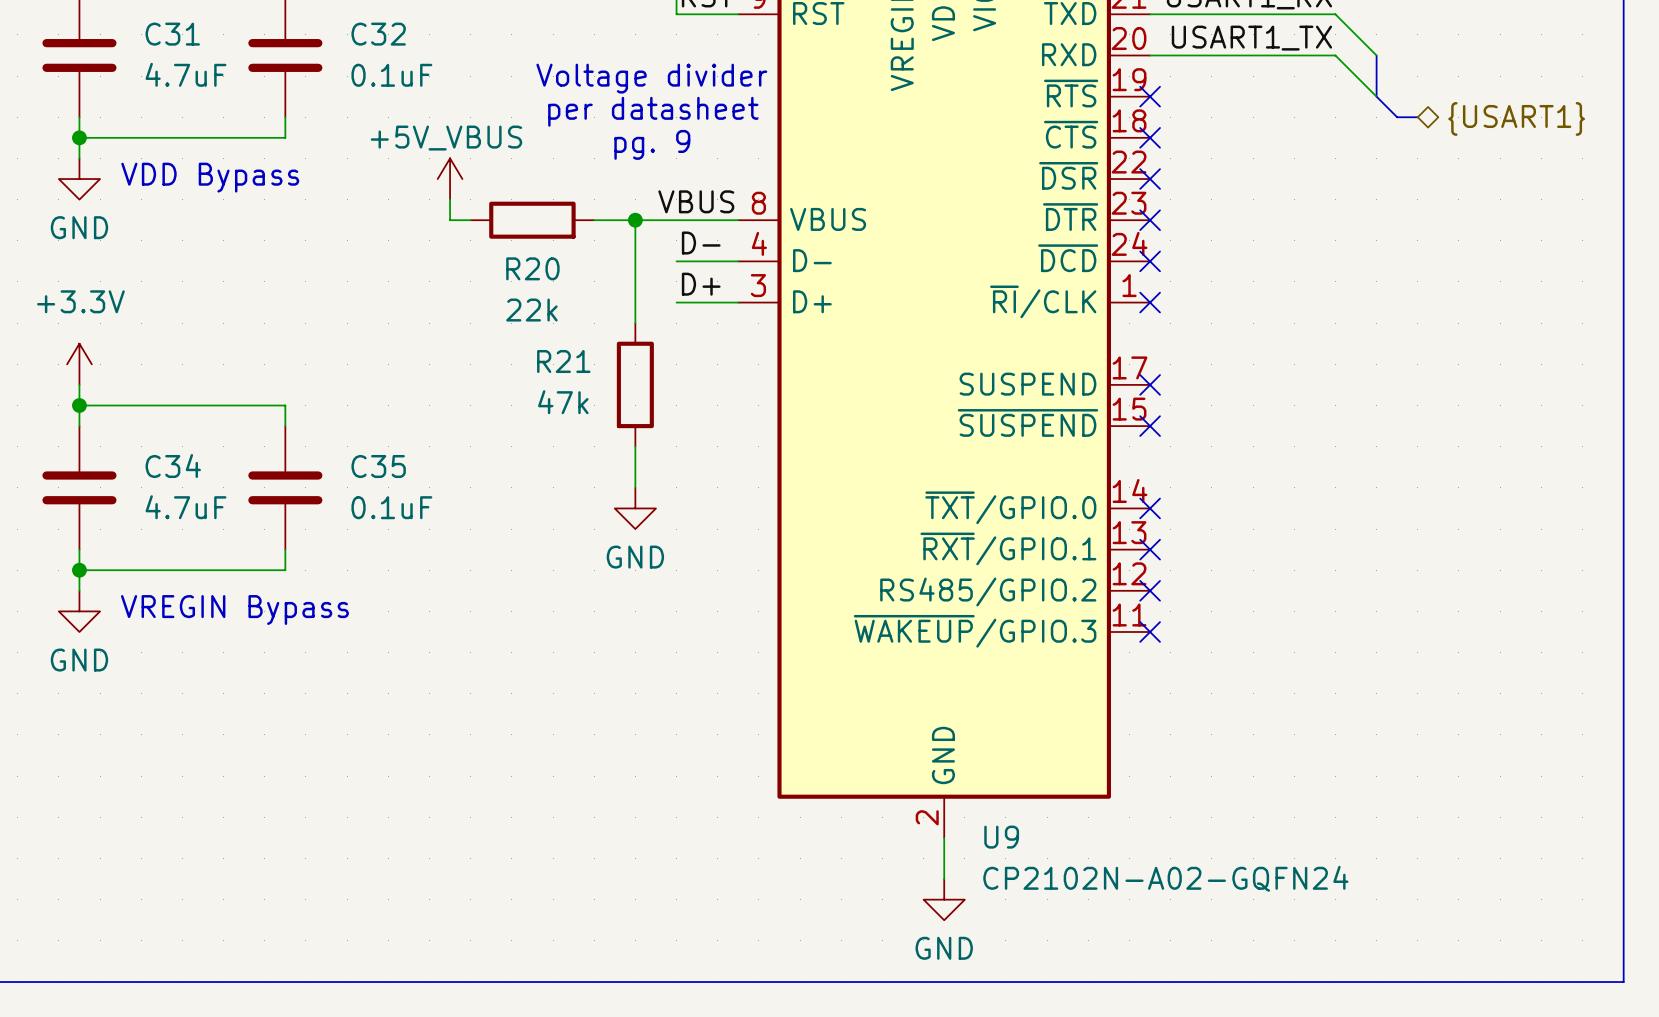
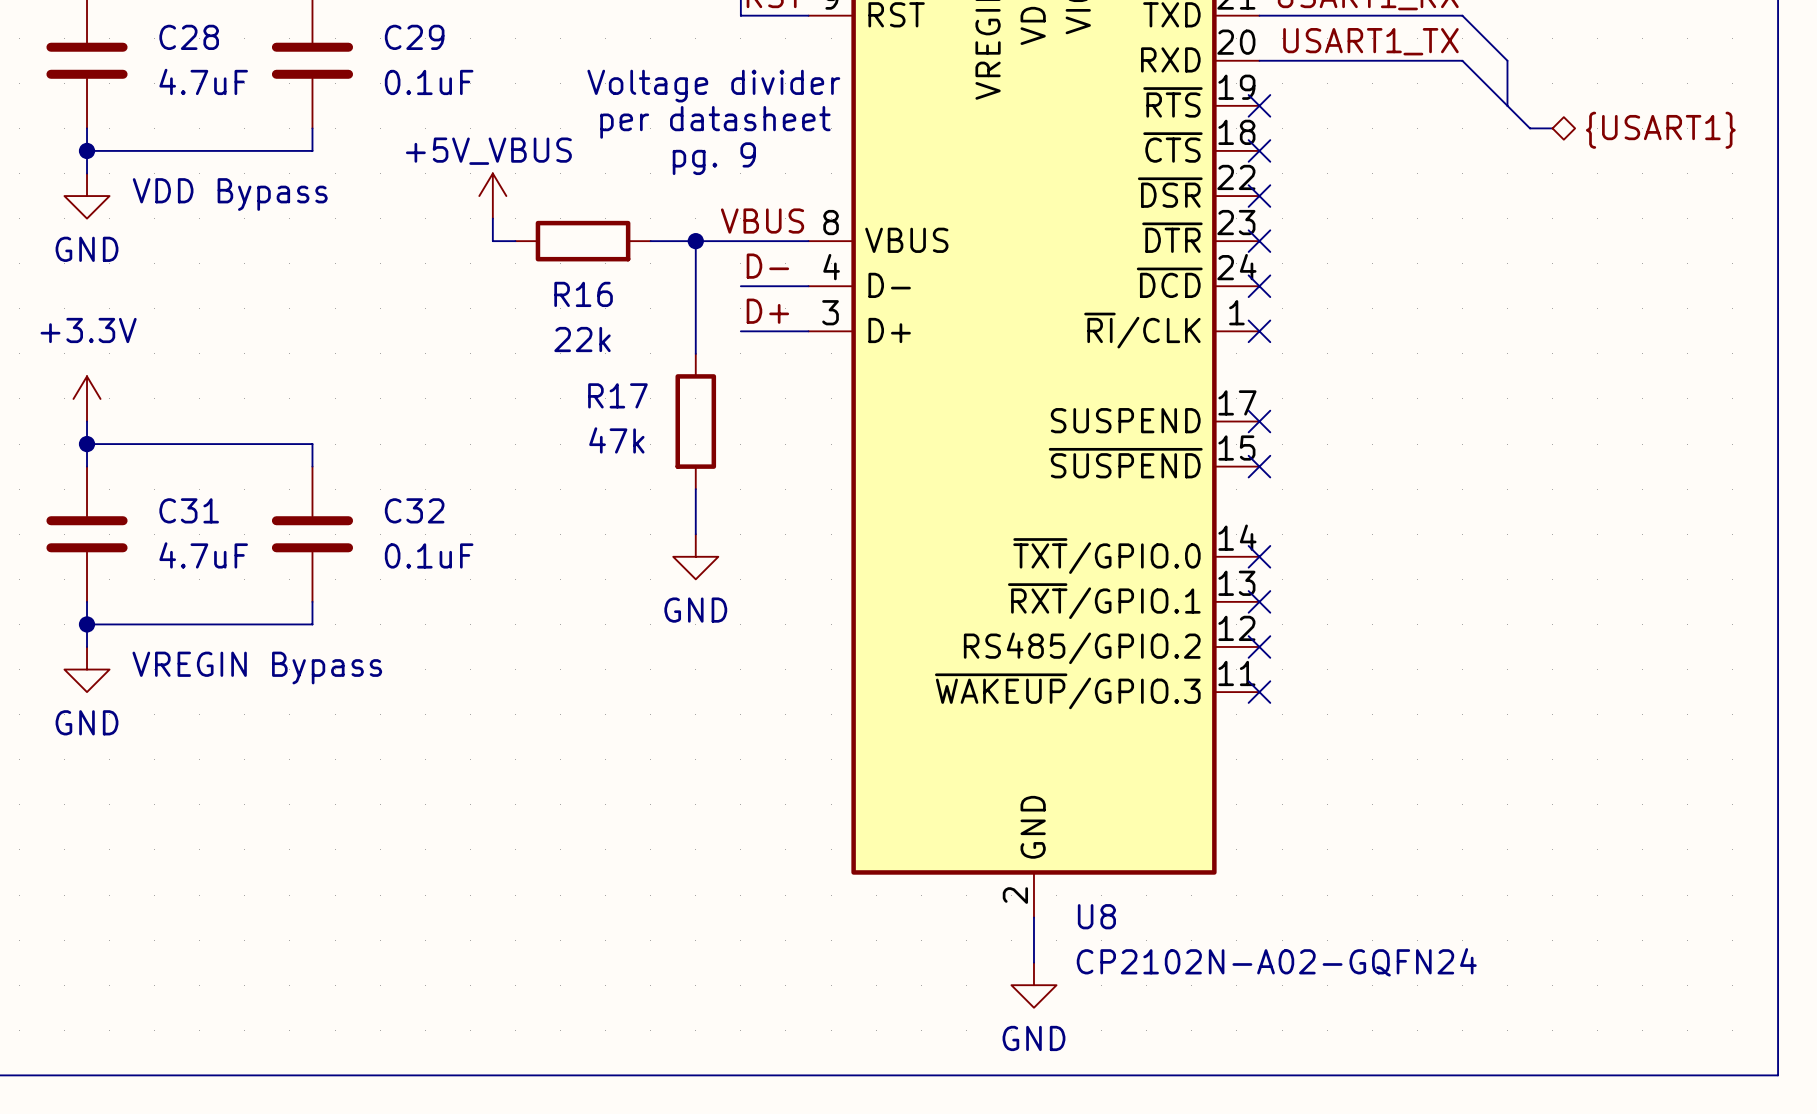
C31 name: C31 (172, 34) -> C28 (189, 37)
C32 name: C32 (378, 34) -> C29 (414, 37)
R20 name: R20 (532, 268) -> R16 (583, 294)
R21 name: R21 (563, 361) -> R17 (617, 395)
C34 name: C34 (173, 466) -> C31 (189, 510)
C35 name: C35 (378, 466) -> C32 (414, 510)
U9 name: U9 (1001, 837) -> U8 (1096, 916)

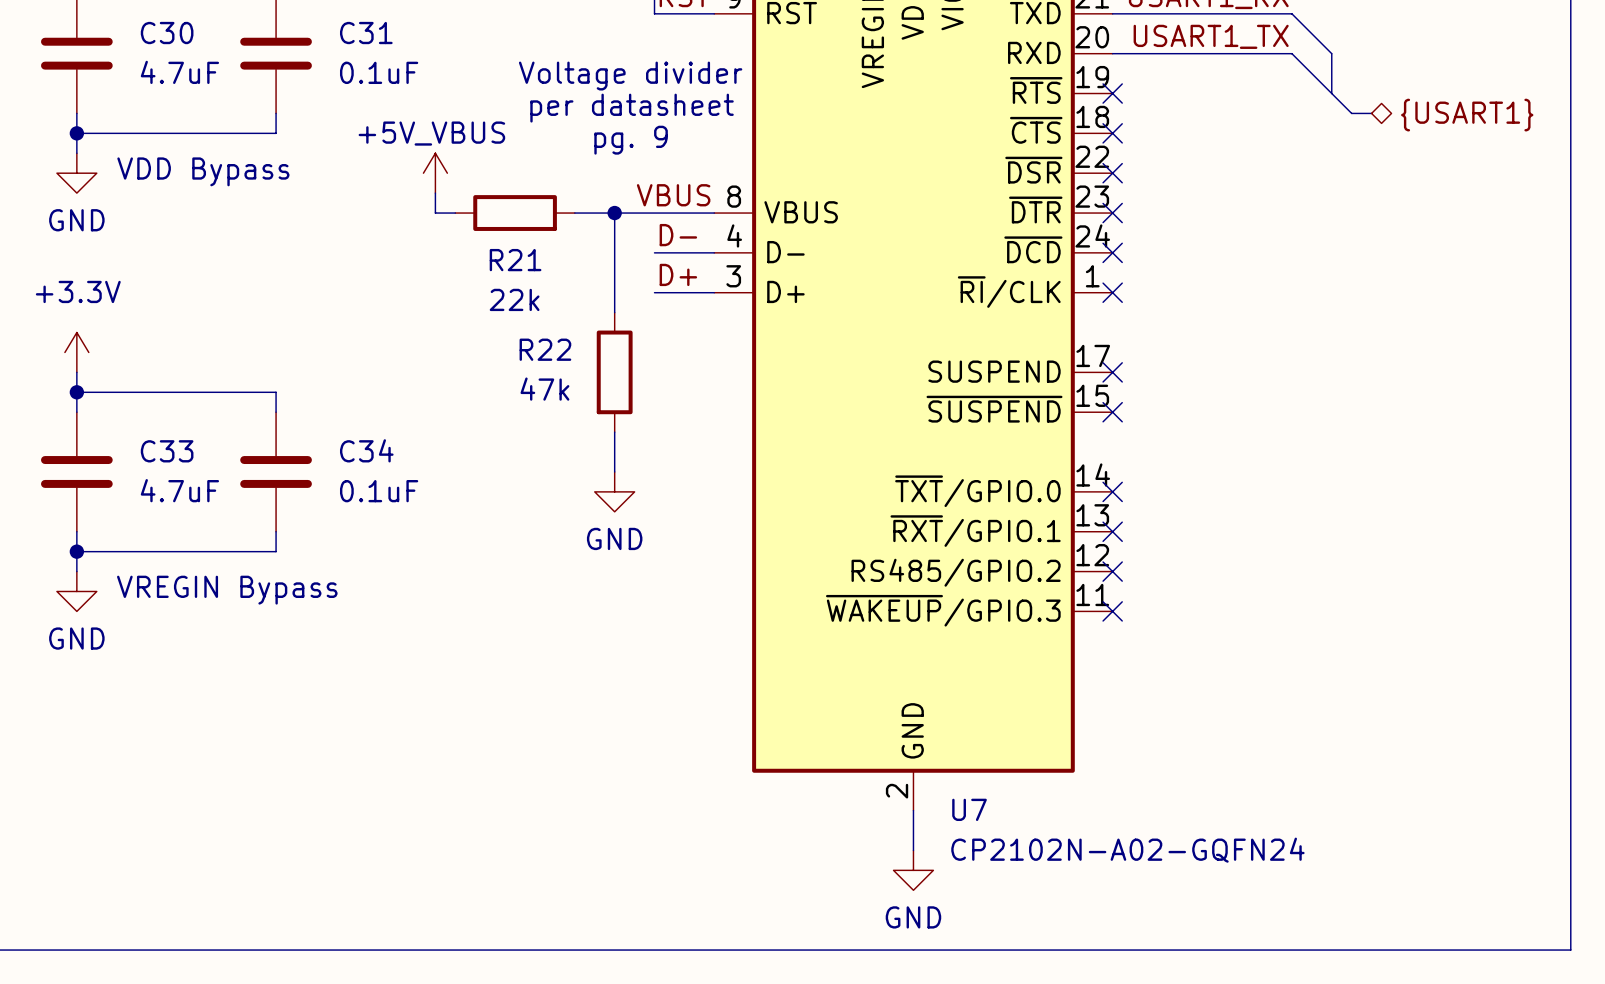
C28 name: C28 (189, 37) -> C30 (167, 33)
C29 name: C29 (414, 37) -> C31 (366, 33)
R16 name: R16 (583, 294) -> R21 (515, 260)
R17 name: R17 (617, 395) -> R22 (545, 349)
C31 name: C31 (189, 510) -> C33 (167, 451)
C32 name: C32 (414, 510) -> C34 (366, 450)
U8 name: U8 (1096, 916) -> U7 (969, 809)

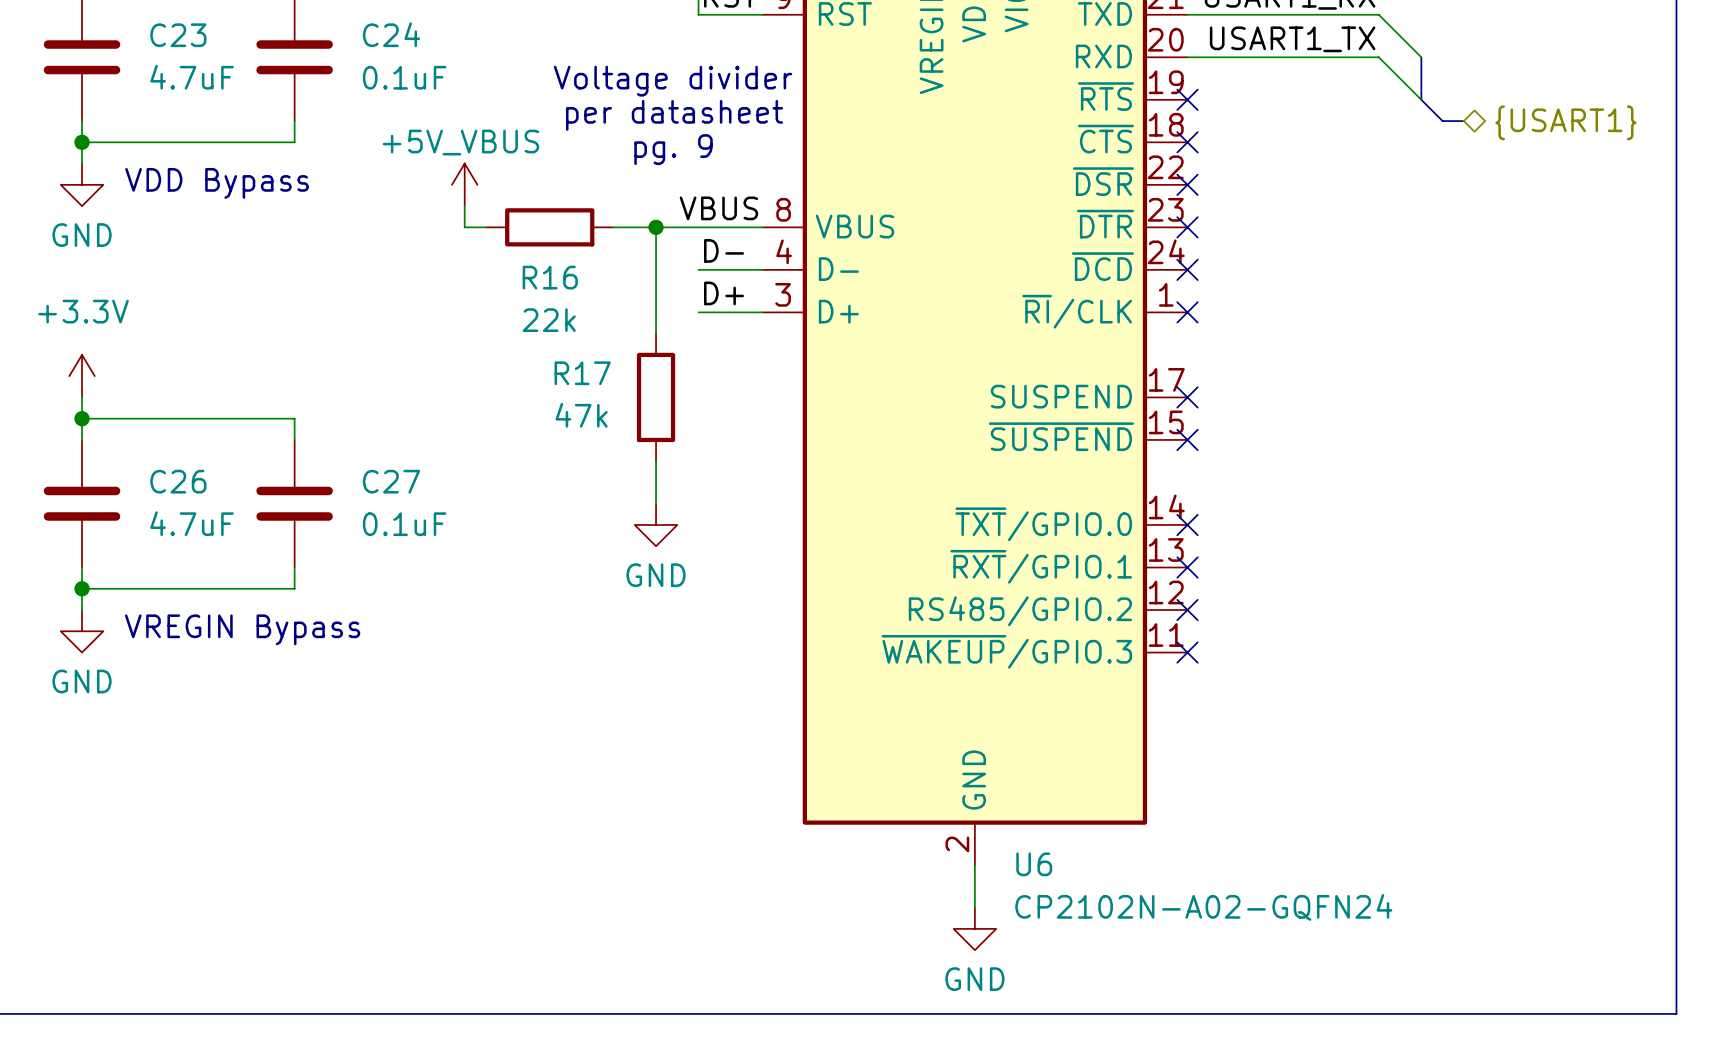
C30 name: C30 (167, 33) -> C23 (178, 35)
C31 name: C31 (366, 33) -> C24 (391, 34)
R21 name: R21 (515, 260) -> R16 (550, 277)
R22 name: R22 (545, 349) -> R17 (582, 373)
C34 name: C34 (366, 450) -> C27 (391, 481)
C33 name: C33 (167, 451) -> C26 (178, 481)
U7 name: U7 (969, 809) -> U6 (1034, 864)

